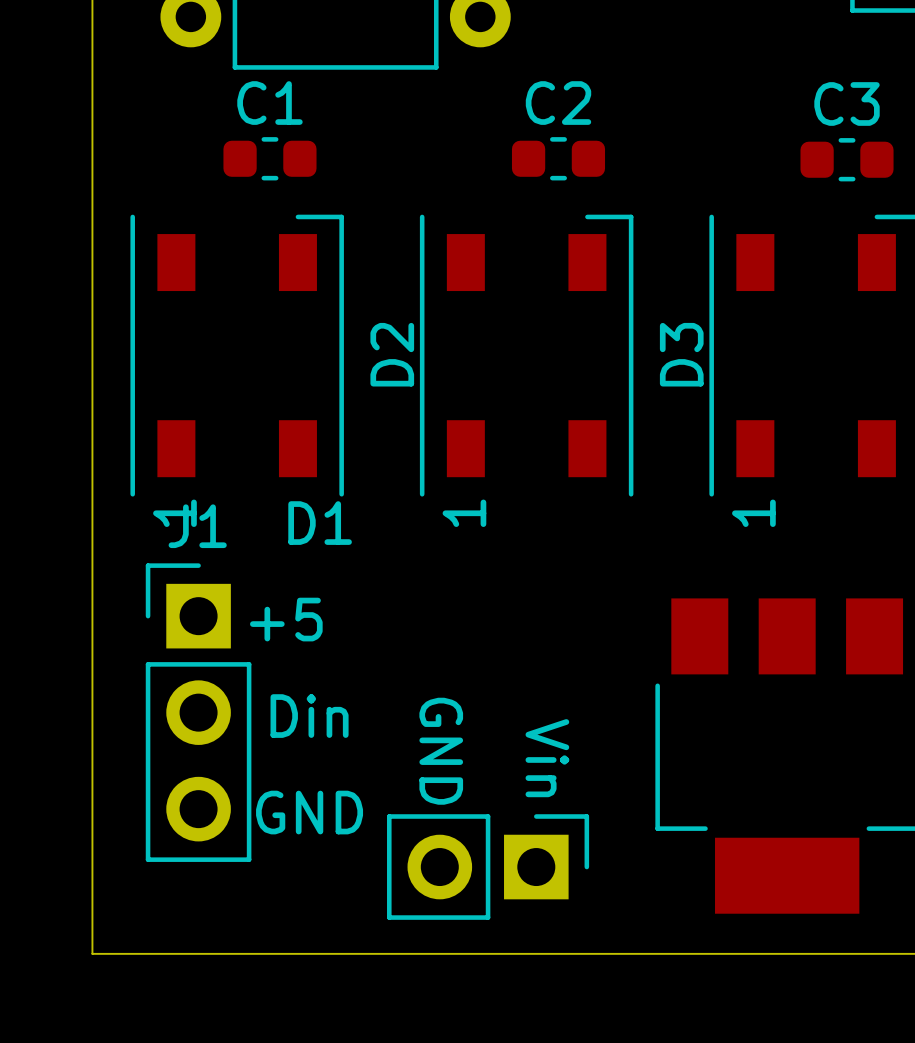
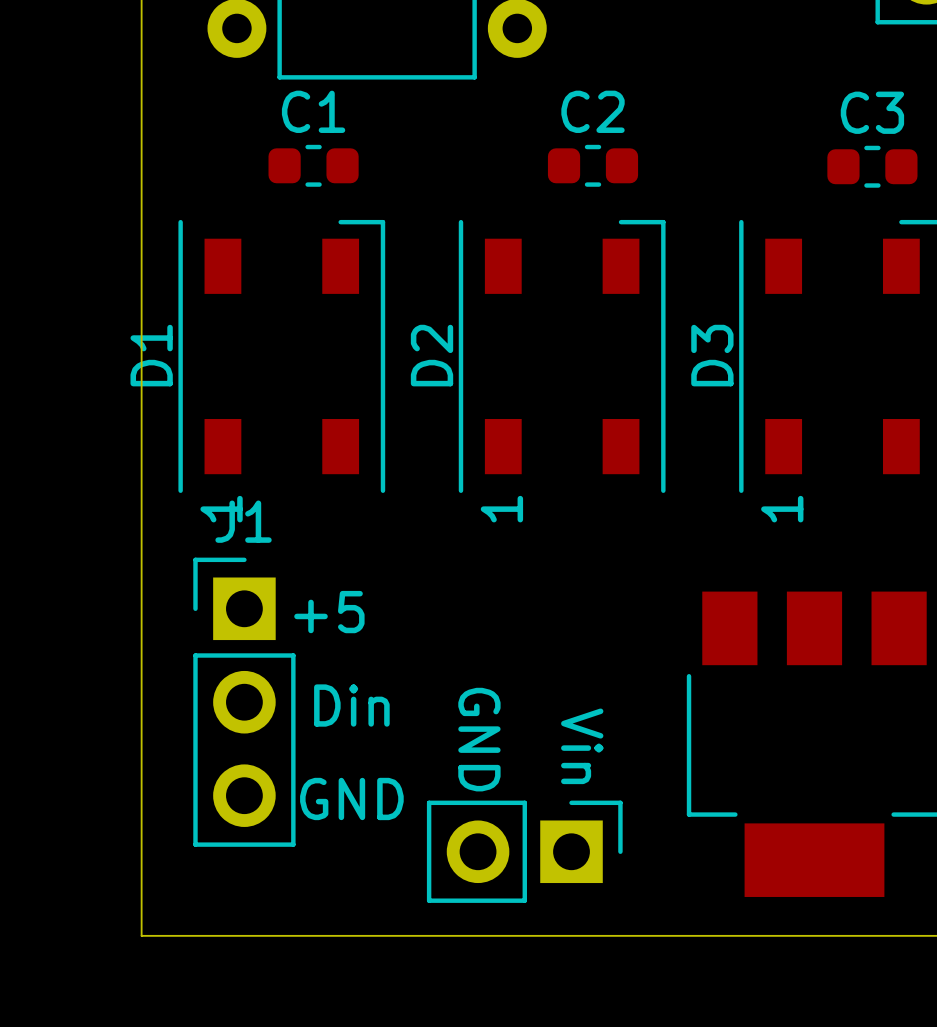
D1 name rotation: 0° (320, 523) -> 90° counterclockwise (151, 355)
D1 name position: D1 (320, 523) -> D1 (151, 355)

